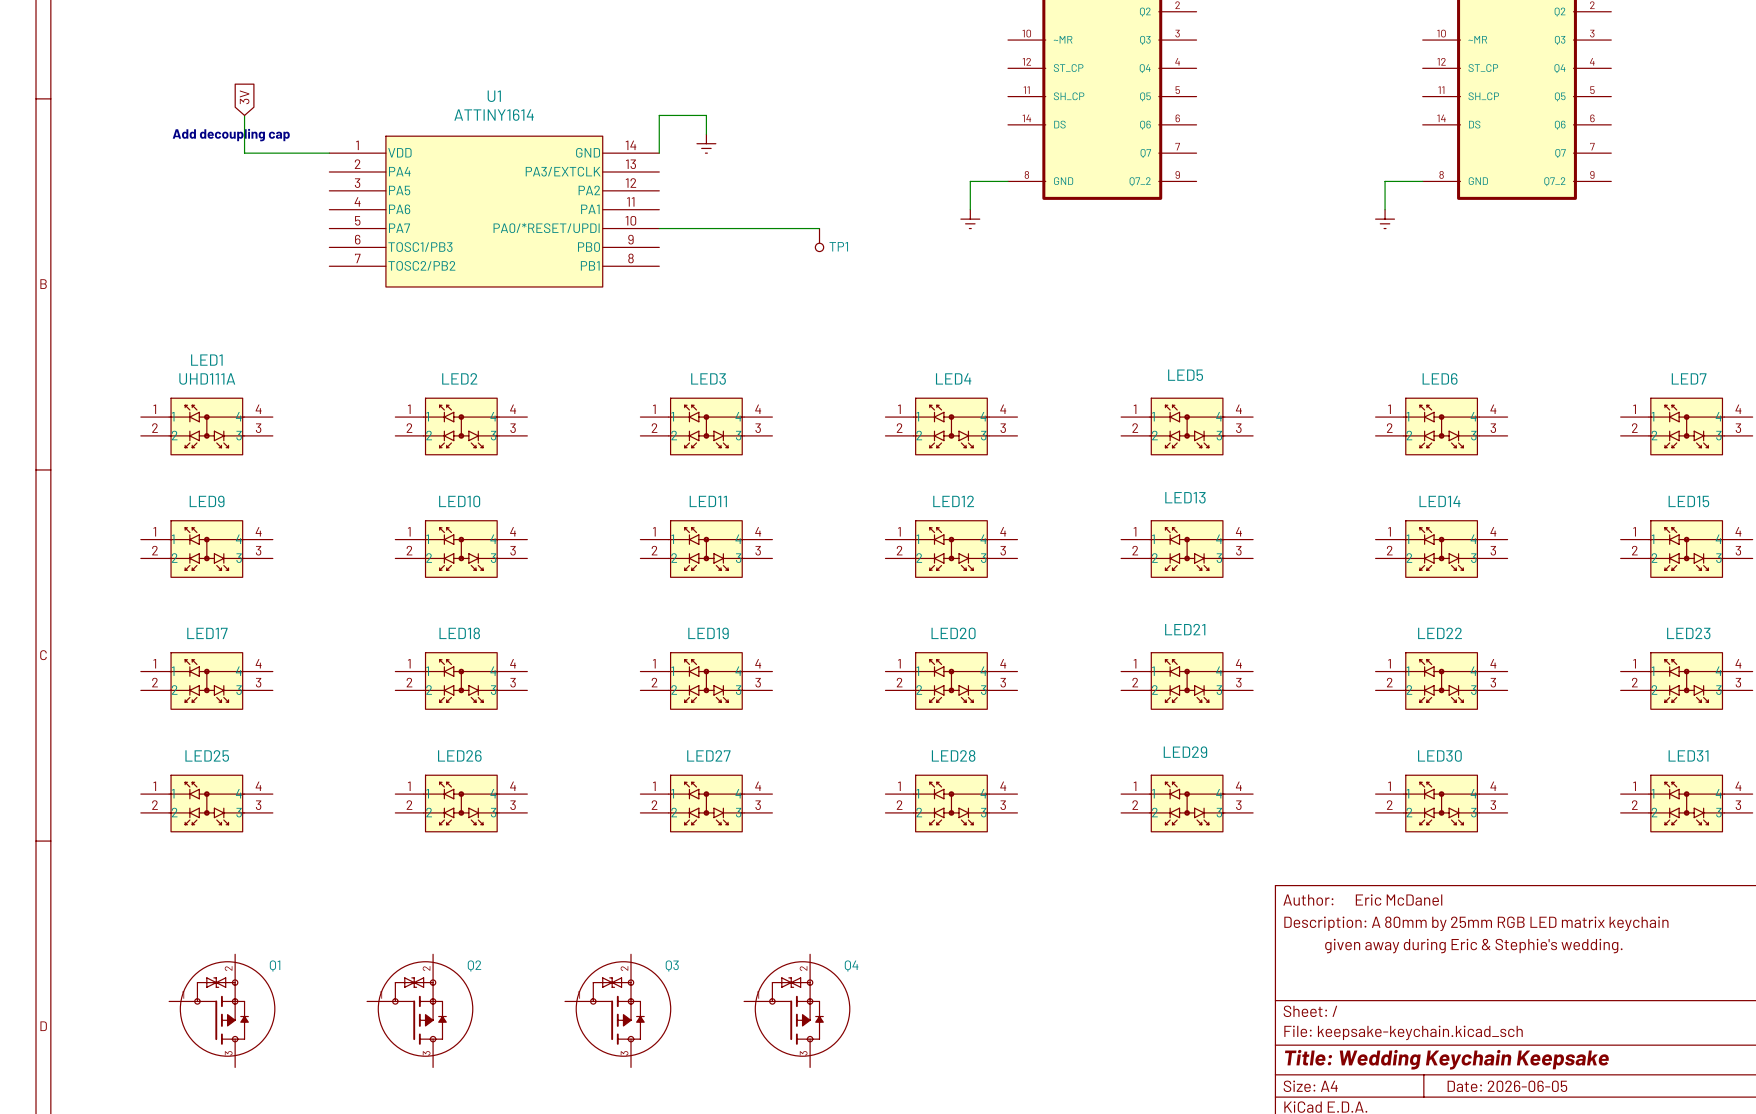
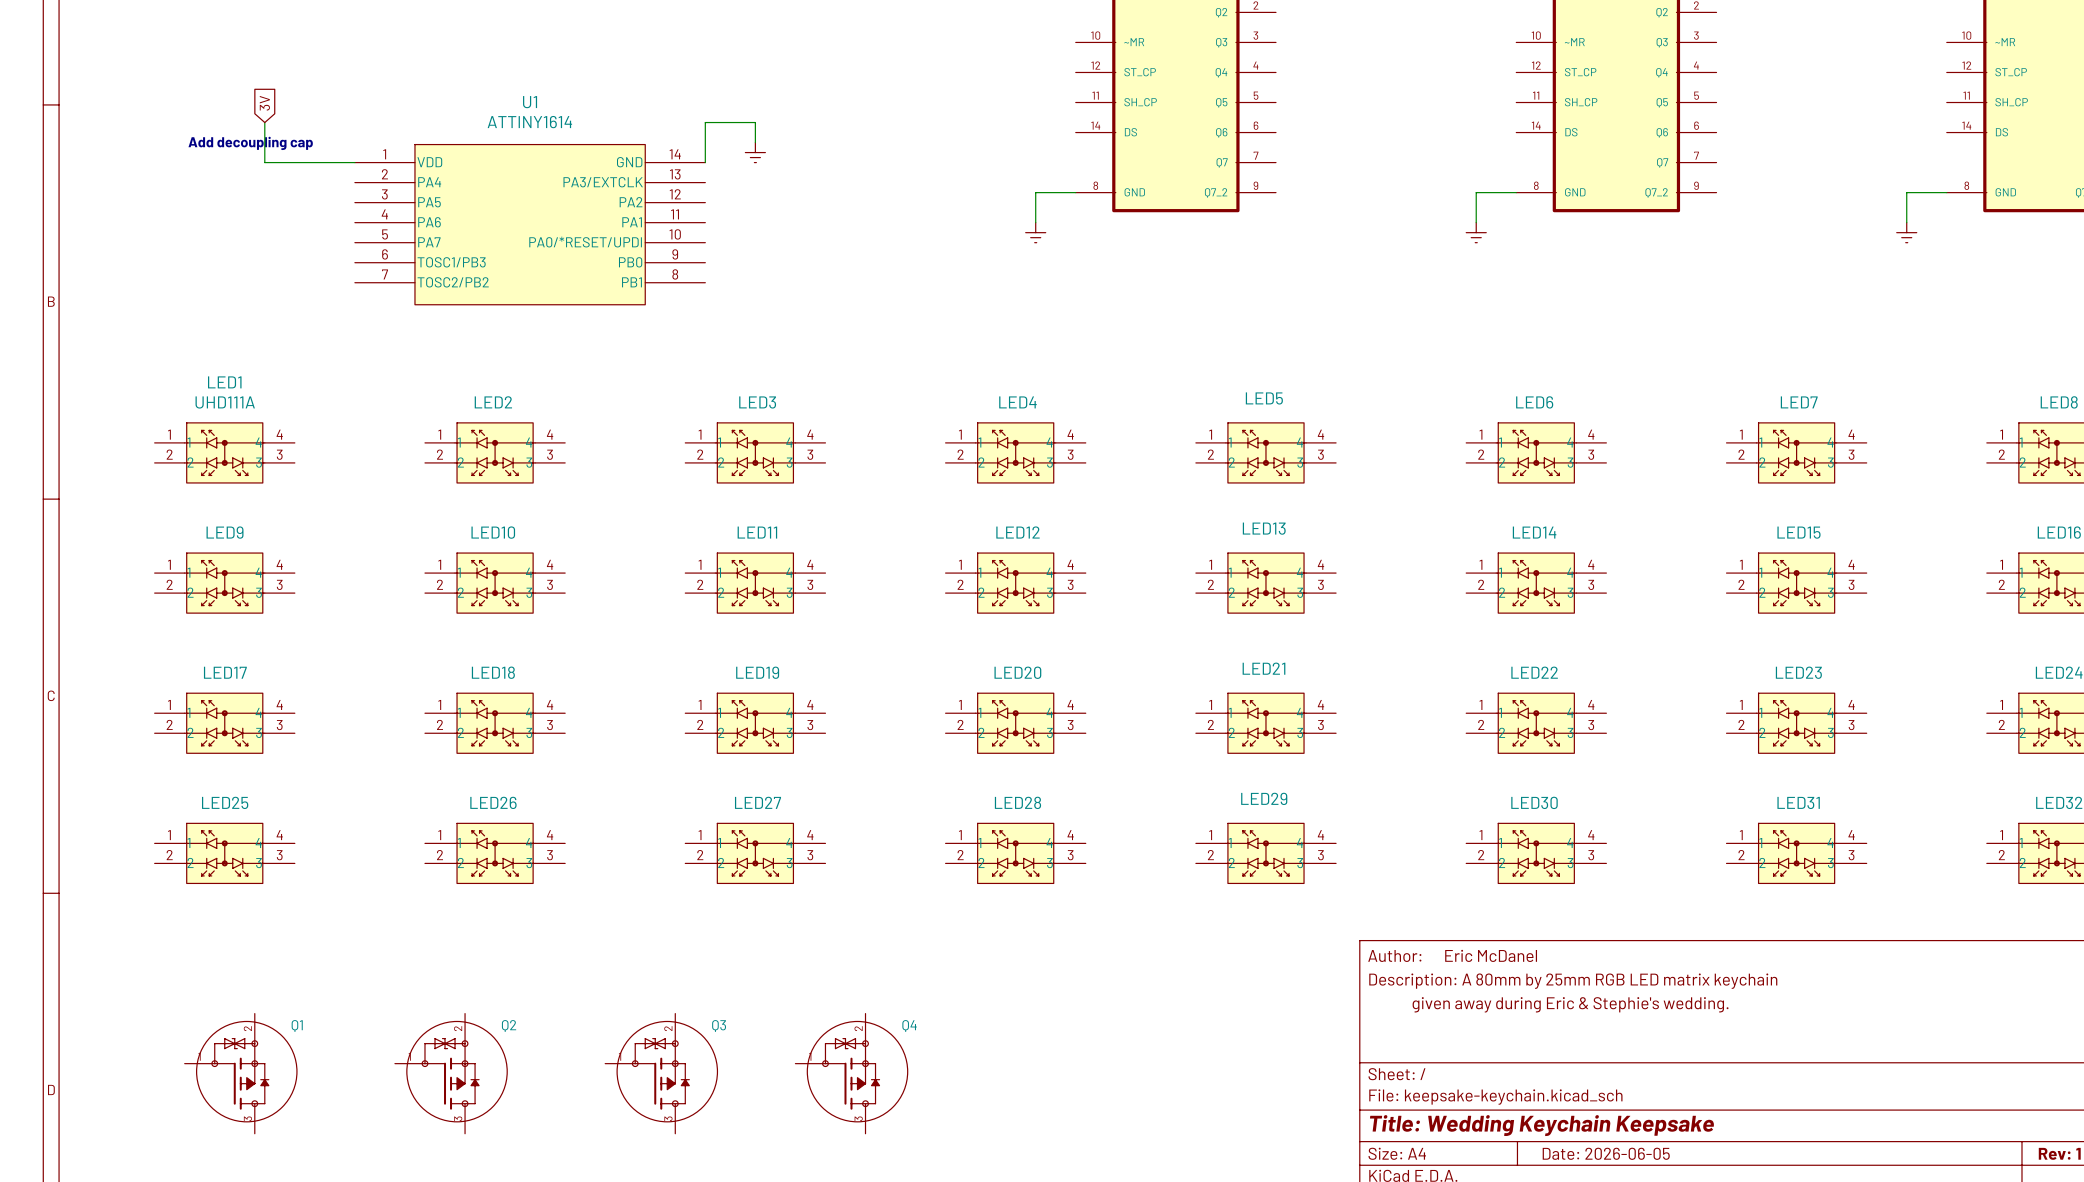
wire: (659, 228) (819, 228) -> none
TP1: (819, 240) -> none

